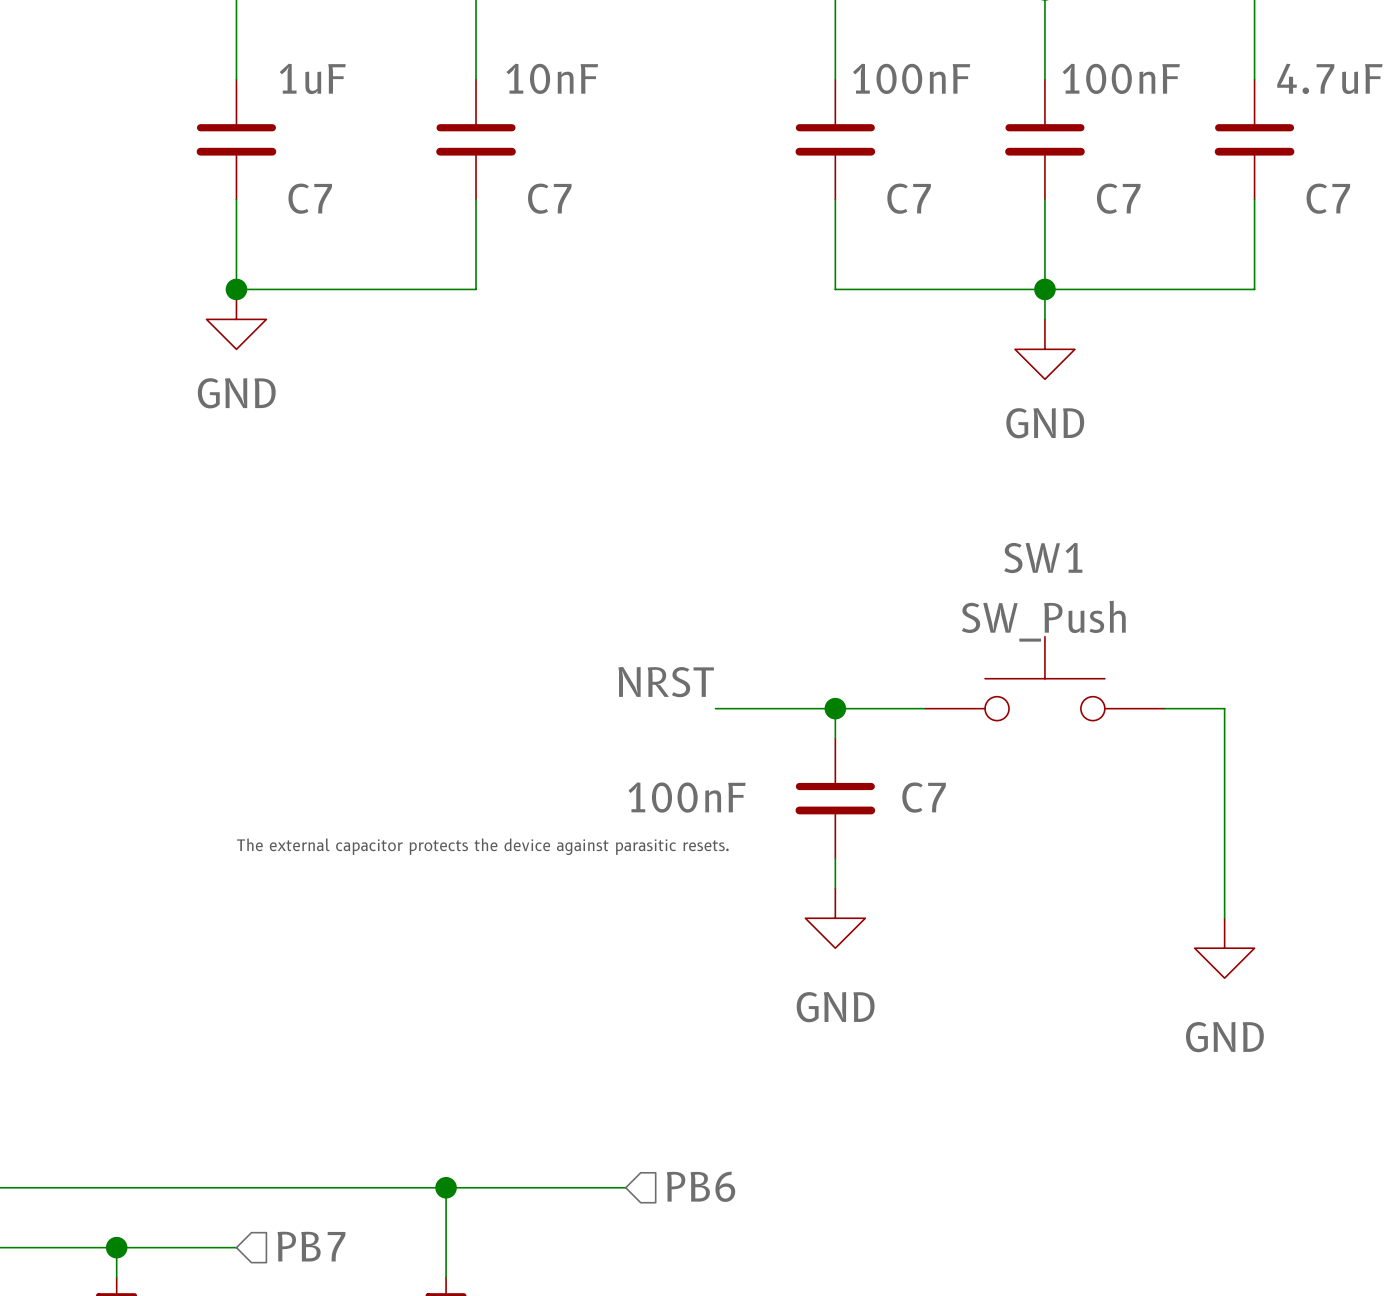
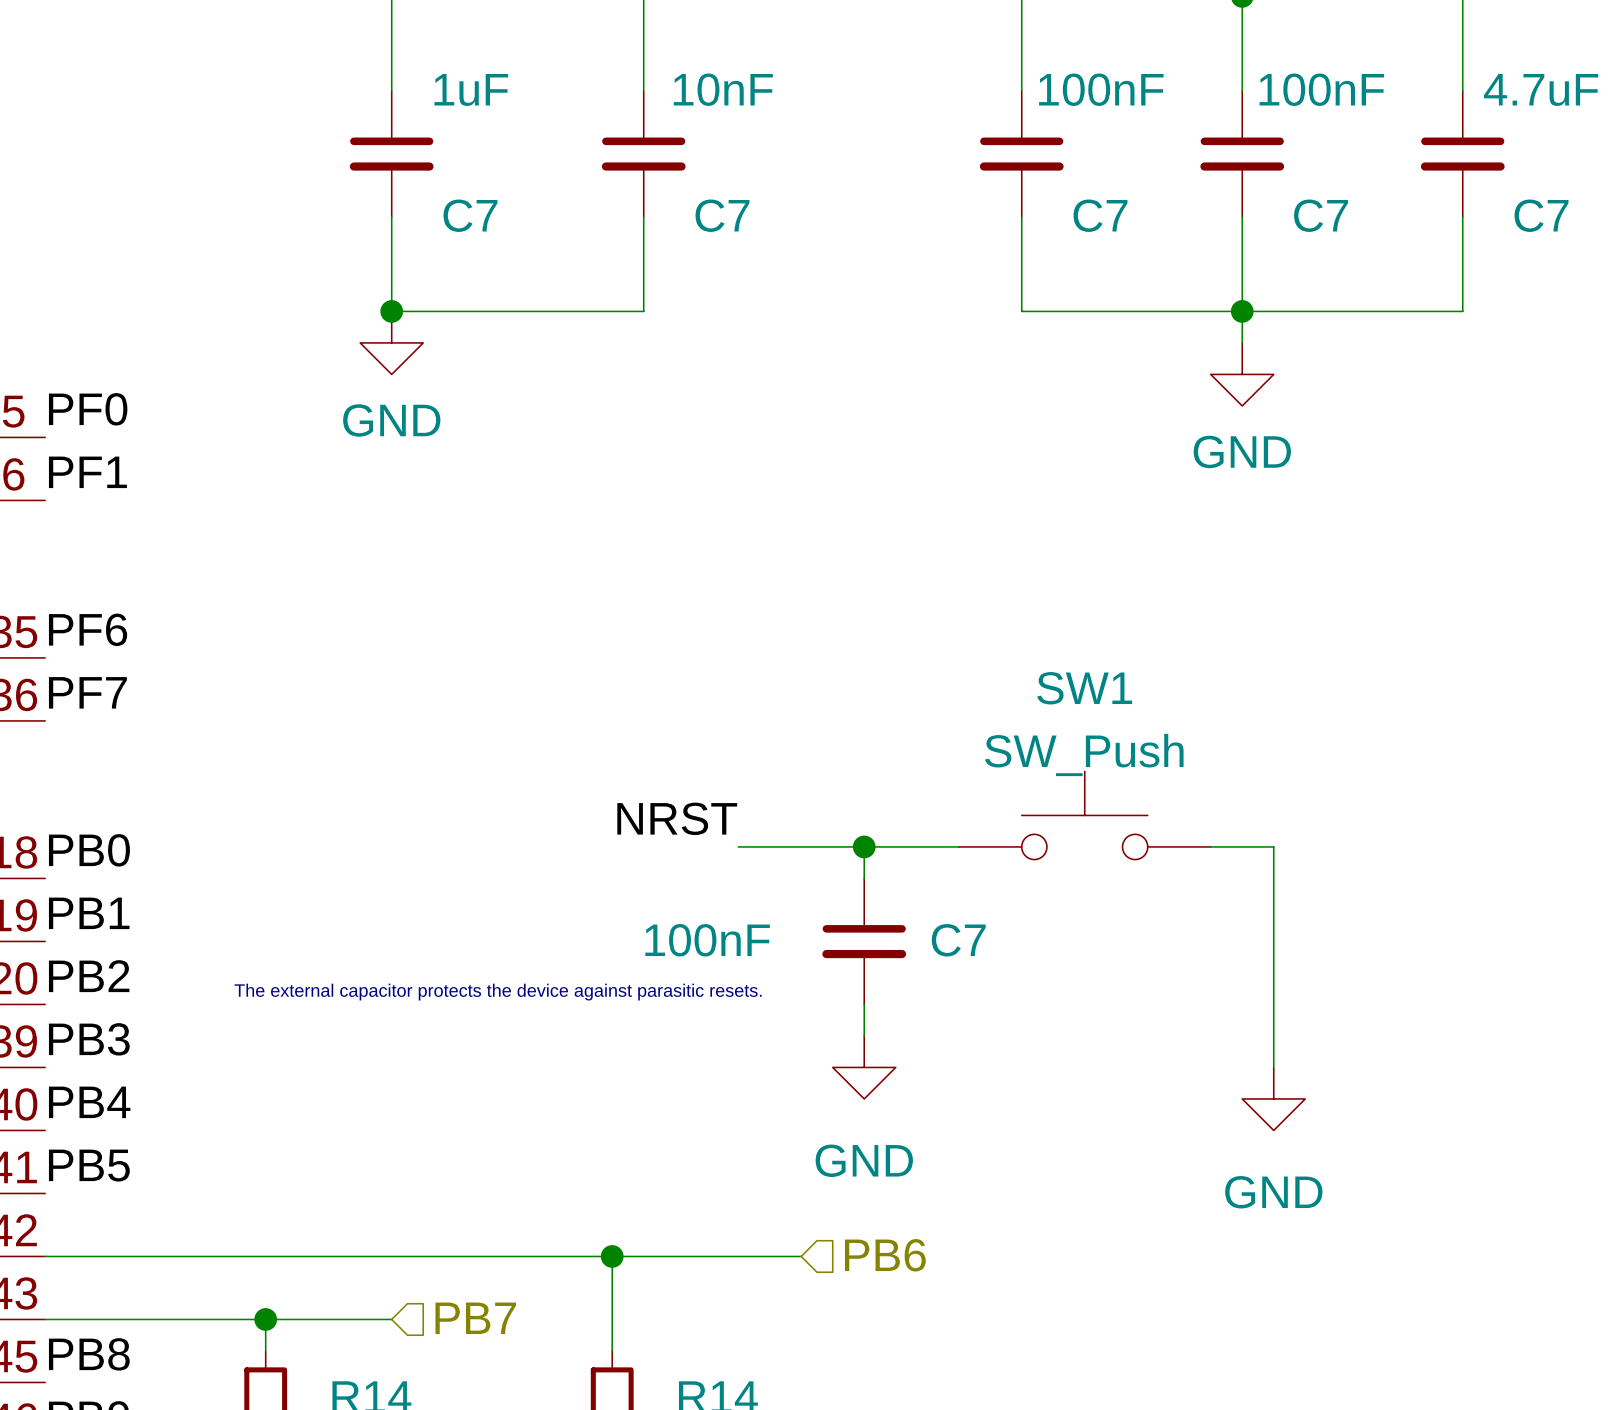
SW1 position: (1044, 678) -> (1084, 815)
label position: NRST (666, 682) -> NRST (677, 818)
wire: (715, 708) (925, 708) -> (738, 846) (958, 846)
wire: (835, 708) (835, 738) -> (864, 846) (864, 878)
junction: (835, 708) -> none
wire: (1164, 708) (1224, 708) (1224, 918) -> (1210, 846) (1273, 846) (1273, 1067)
junction: none -> (864, 846)
C7 position: (835, 798) -> (864, 941)
text position: The external capacitor protects the device against parasitic resets. (482, 846) -> The external capacitor protects the device against parasitic resets. (498, 992)
wire: (835, 858) (835, 888) -> (864, 1004) (864, 1035)
power symbol: GND (835, 918) -> none
power symbol: GND (1224, 948) -> none
power symbol: none -> GND (864, 1067)
power symbol: none -> GND (1273, 1098)

